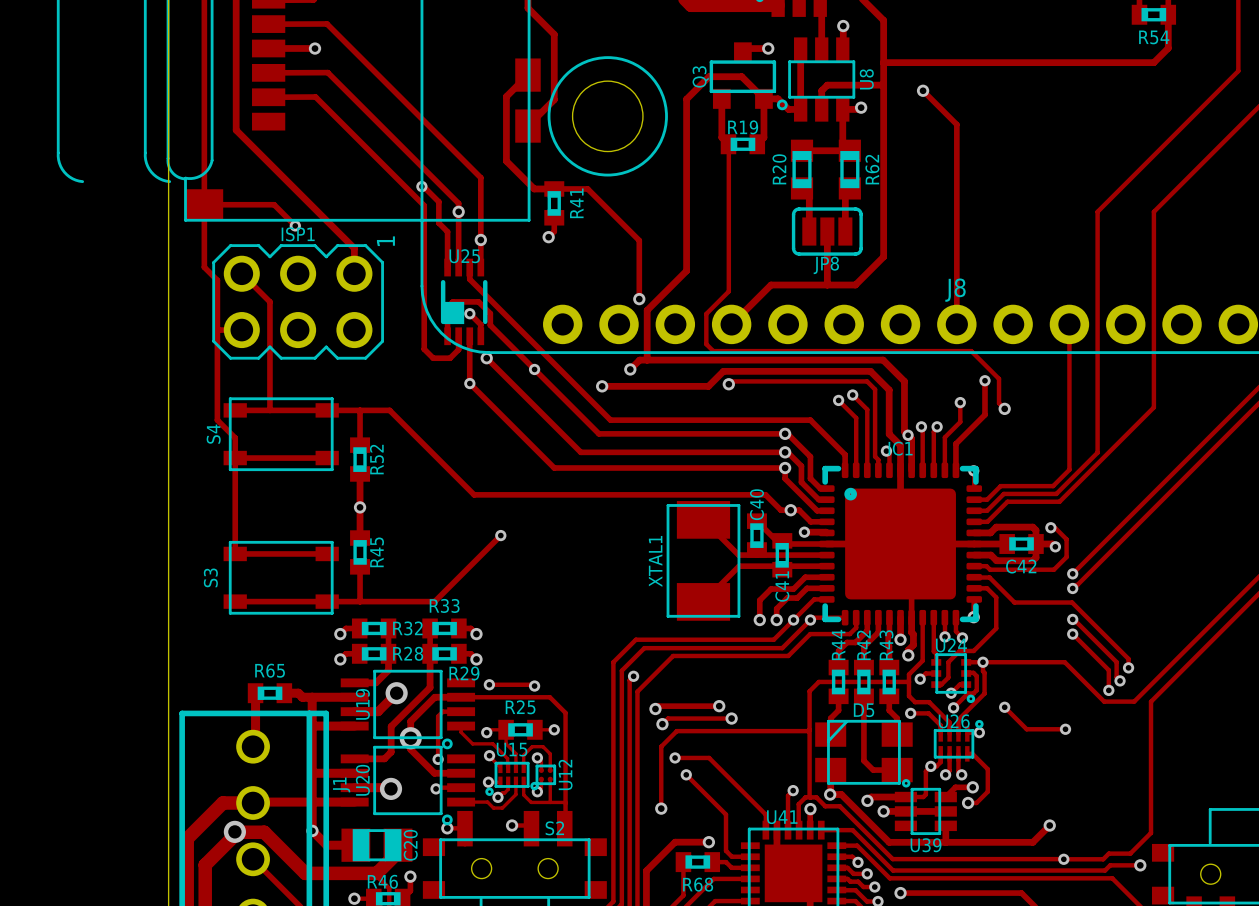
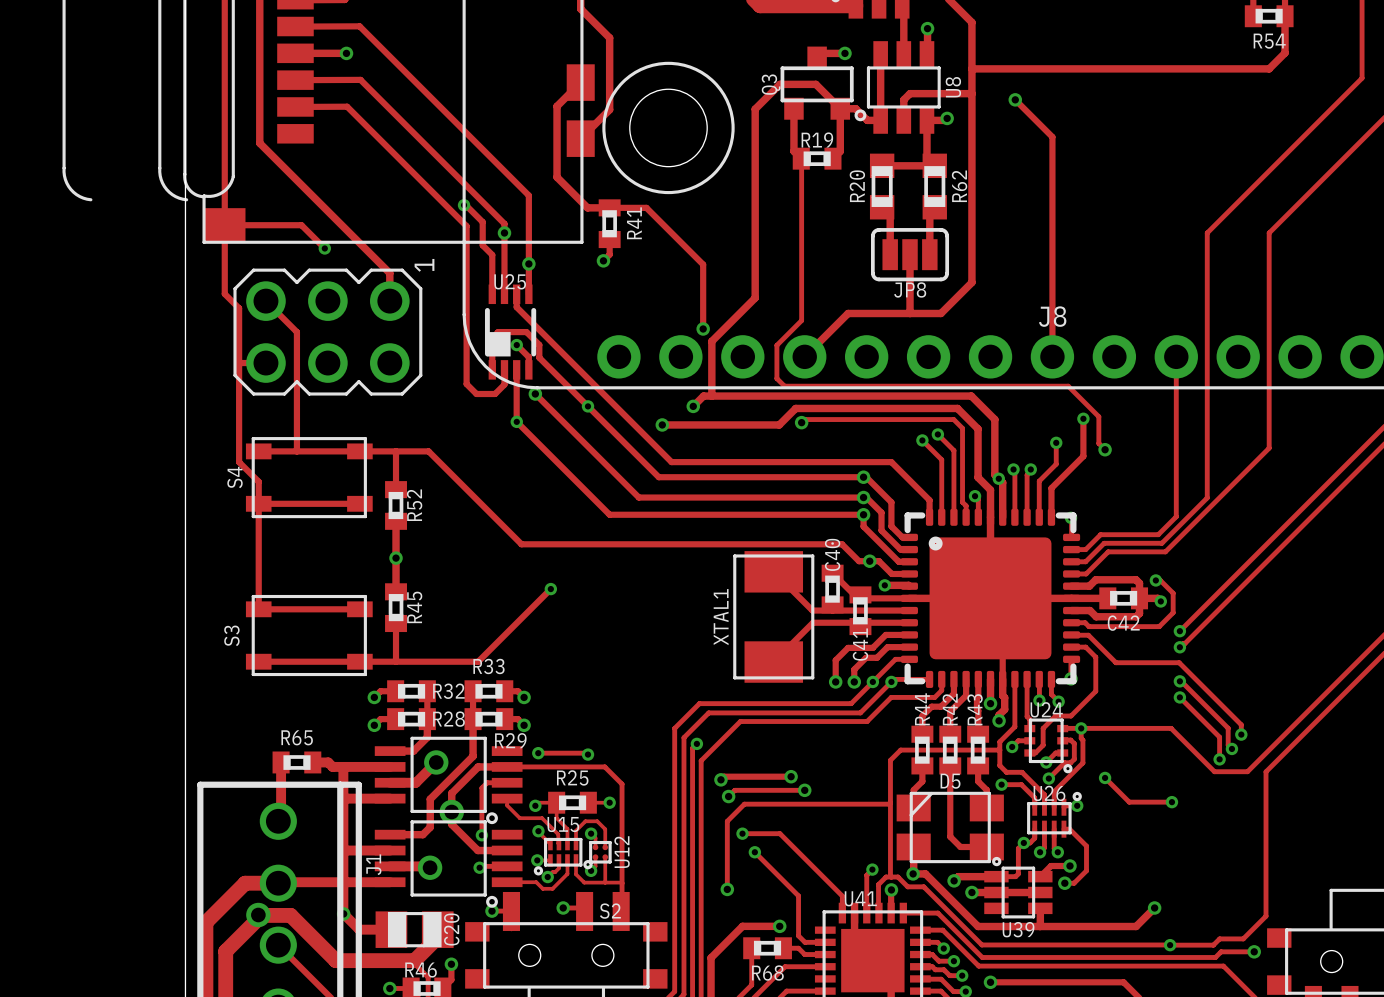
ISP1 name: ISP1 (298, 234) -> none
IC1 name: IC1 (900, 448) -> none
U19 name: U19 (362, 704) -> none
U20 name: U20 (362, 780) -> none

